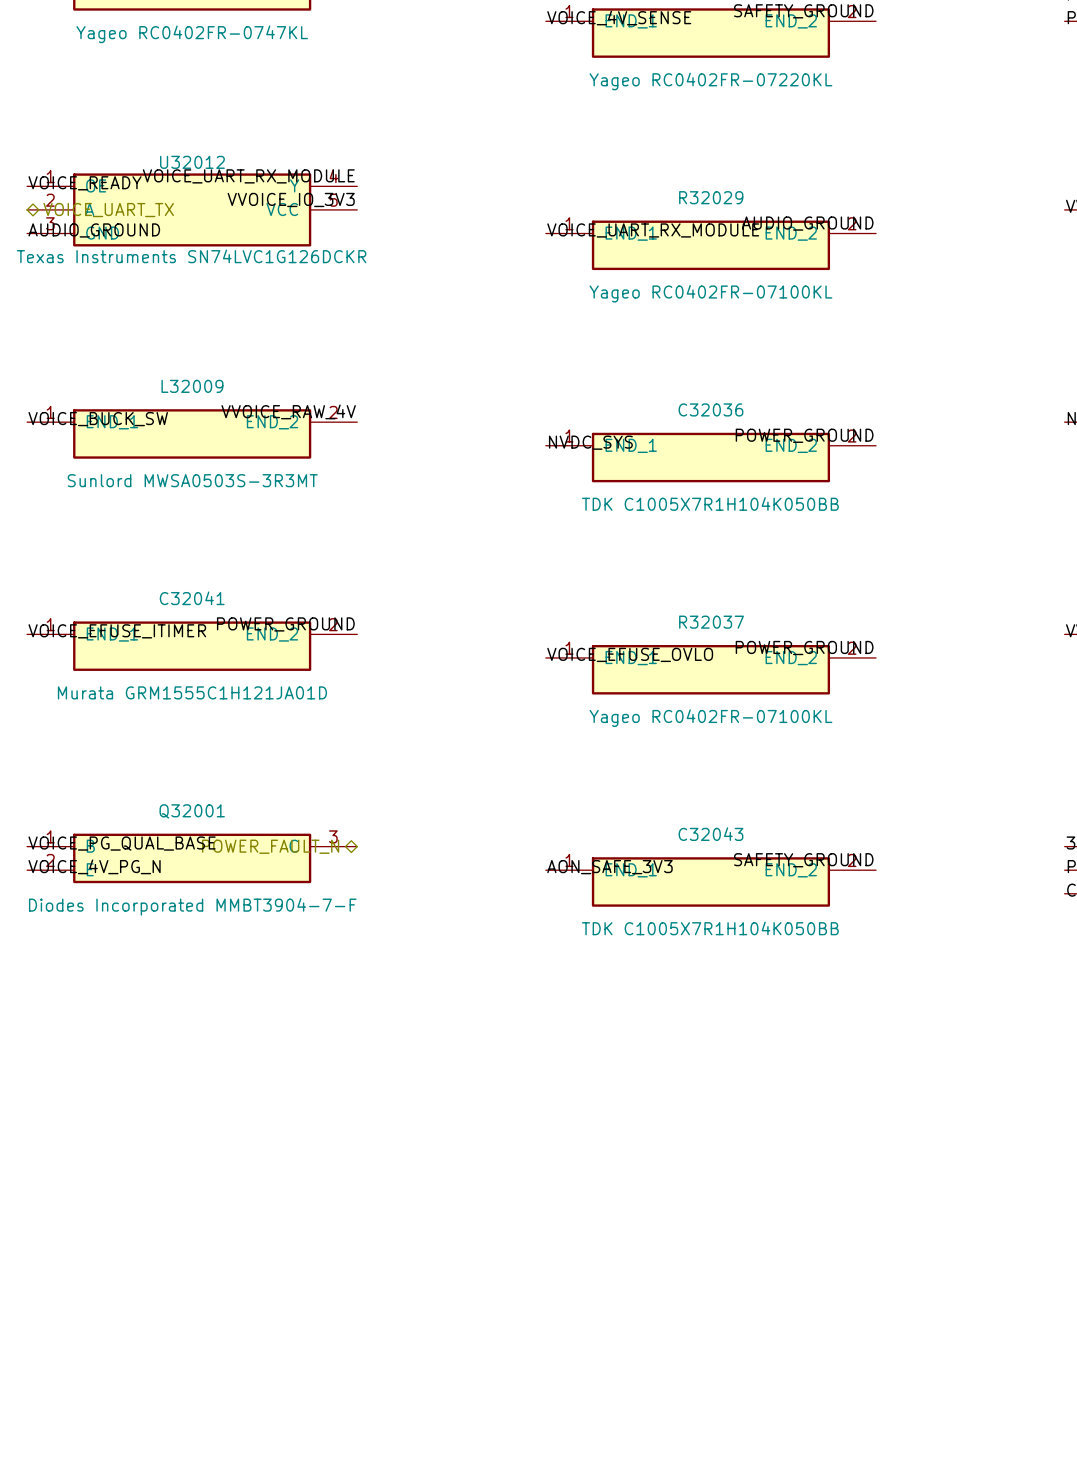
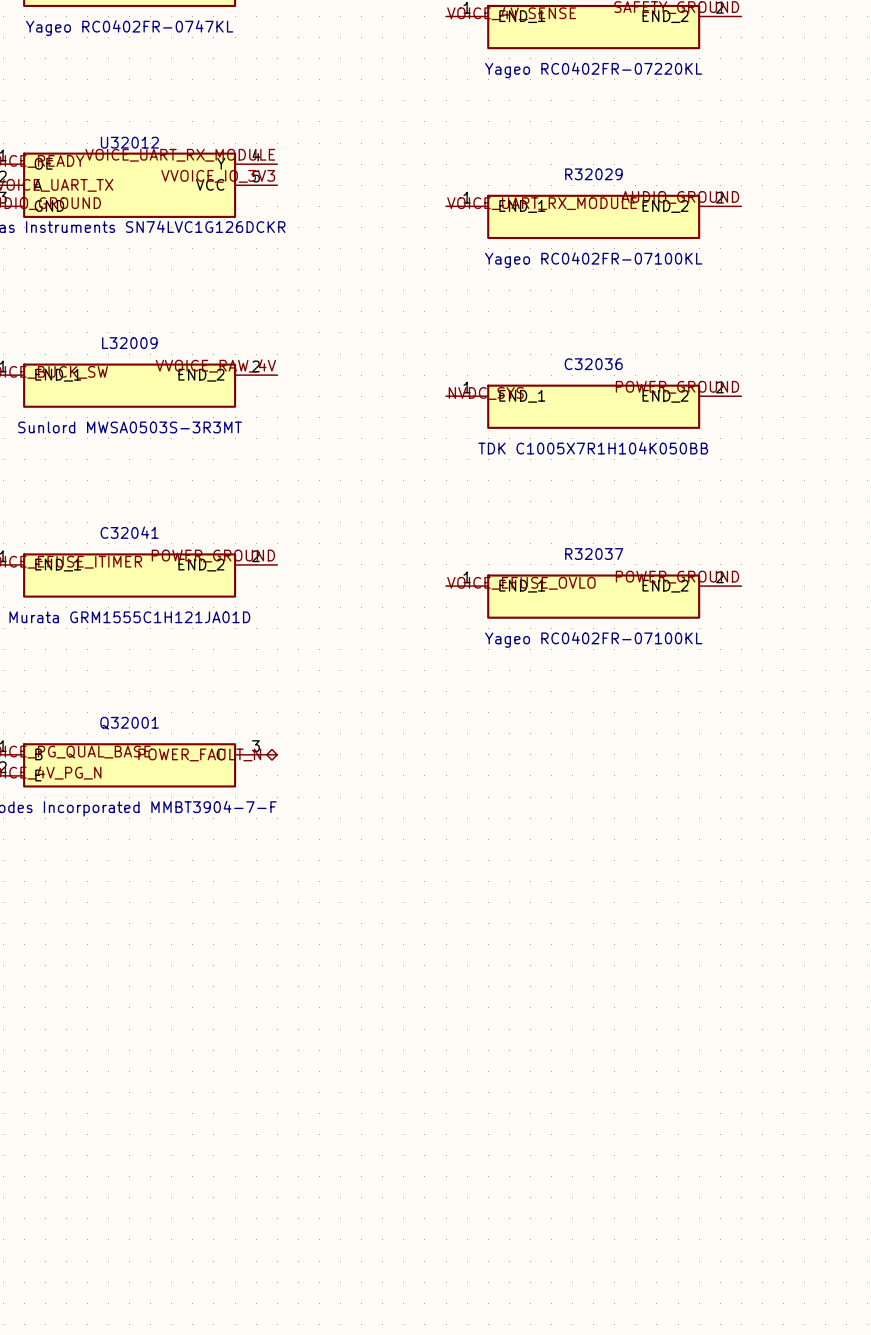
label: SAFETY_GROUND (803, 860) -> none
label: AON_SAFE_3V3 (609, 867) -> none
C32043: TDK C1005X7R1H104K050BB (710, 881) -> none

